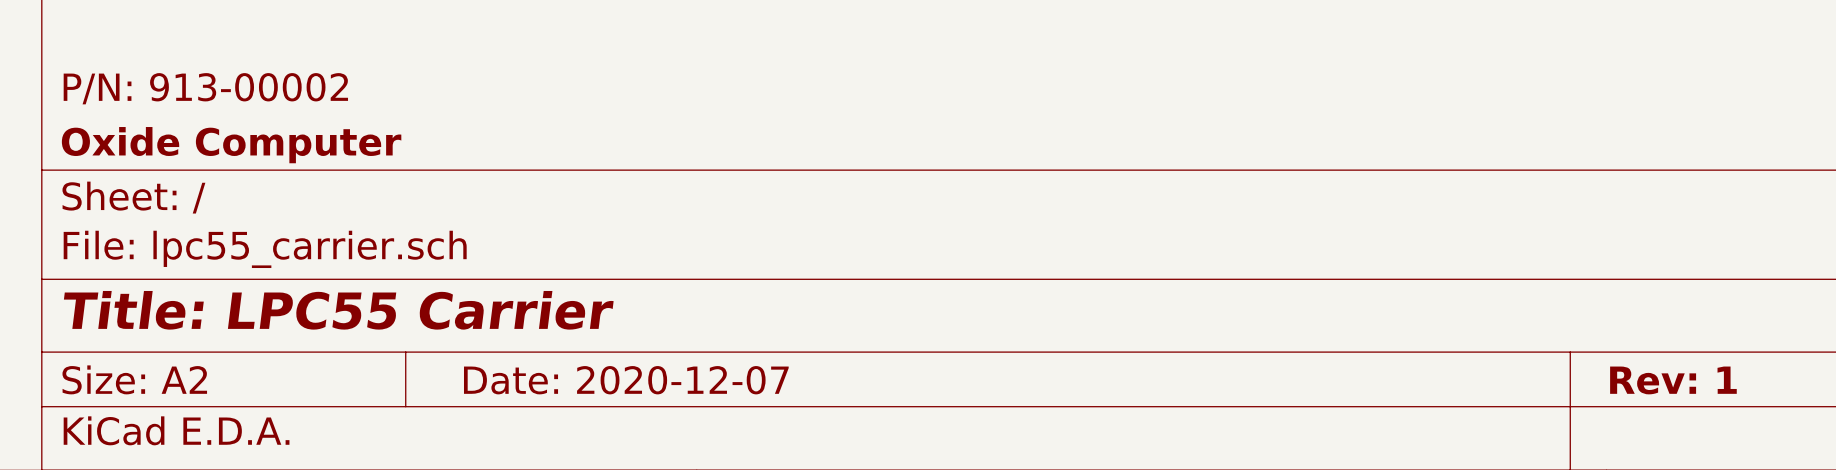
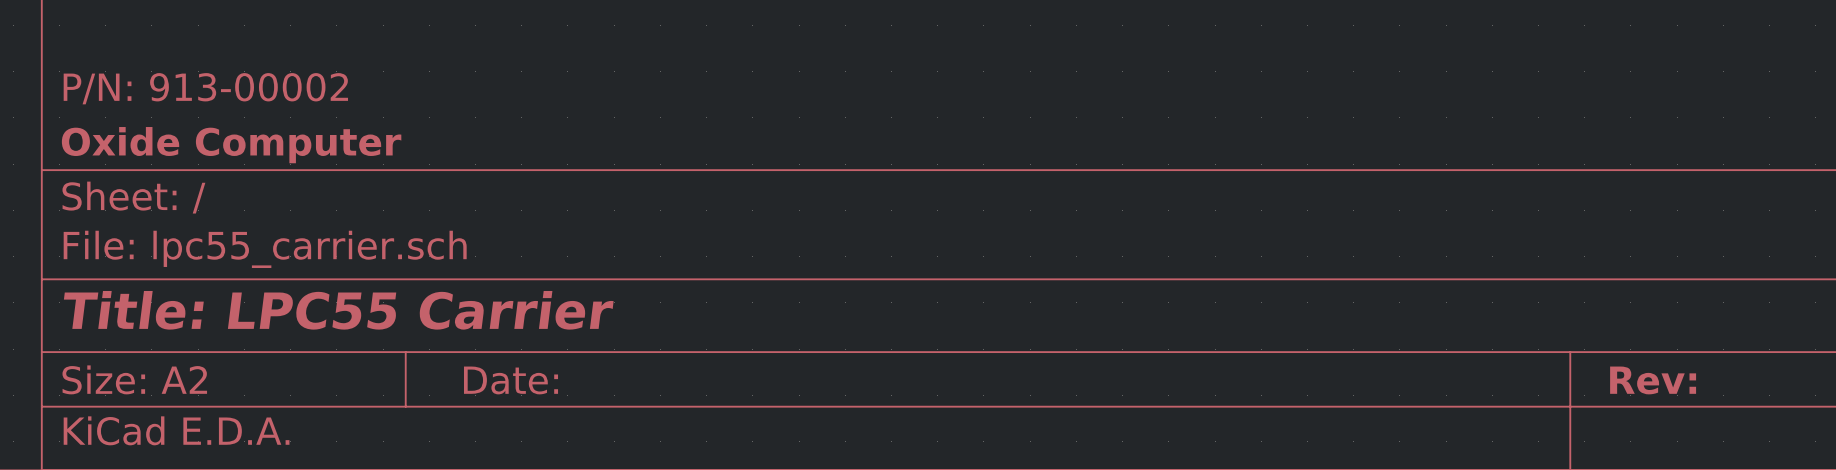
title block: Date: 2020-12-07 (626, 380) -> Date: (511, 380)
title block: Rev: 1 (1673, 380) -> Rev: (1653, 380)

